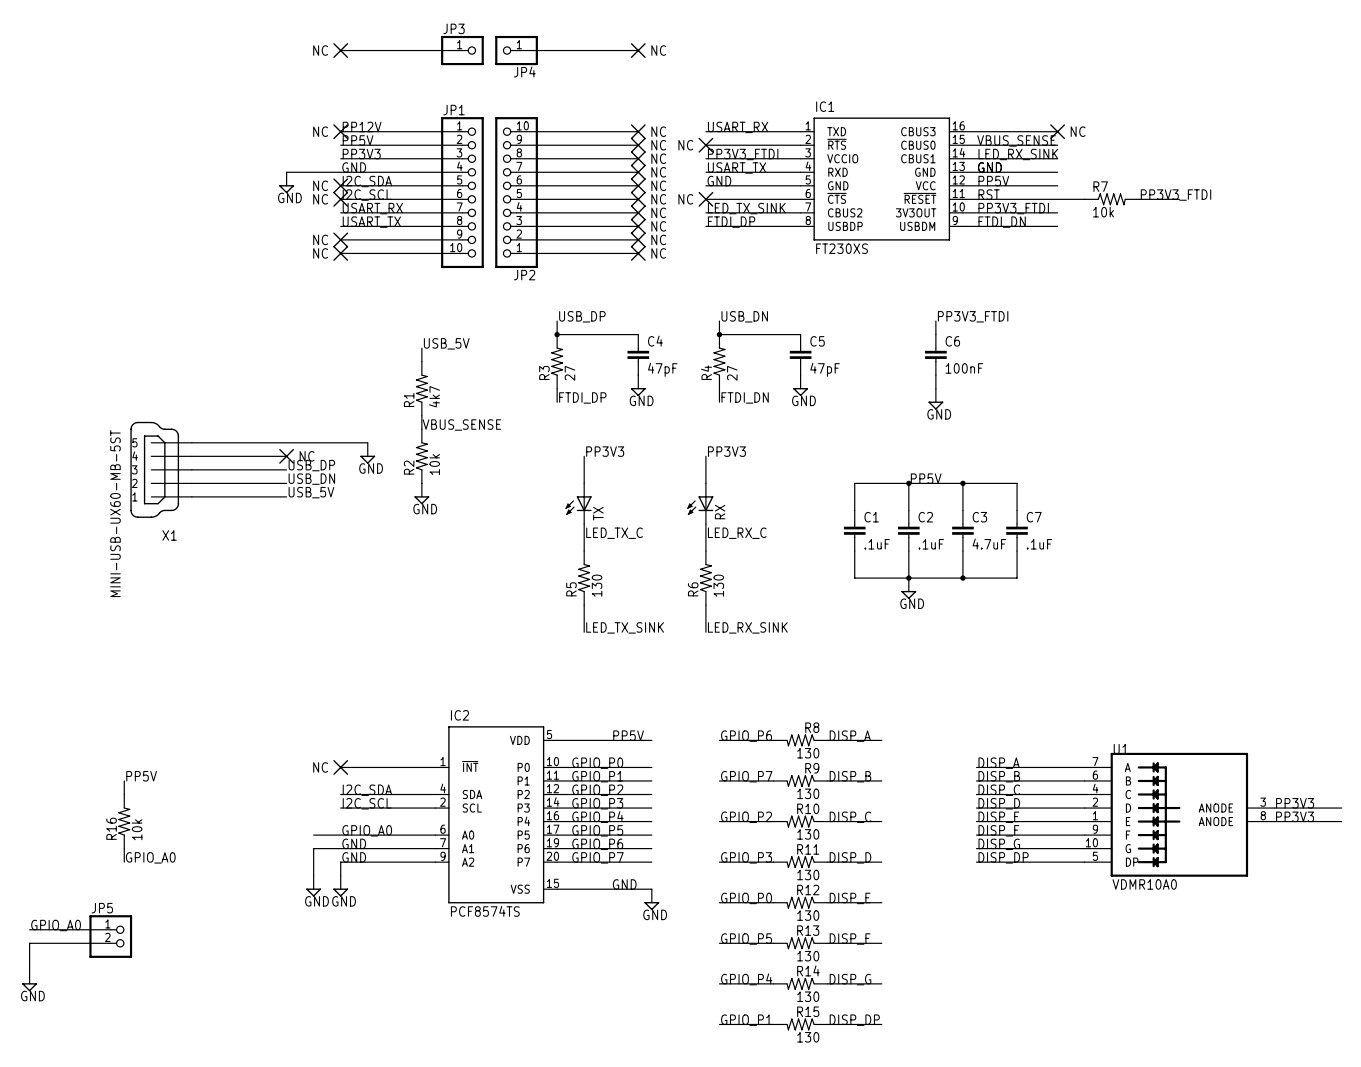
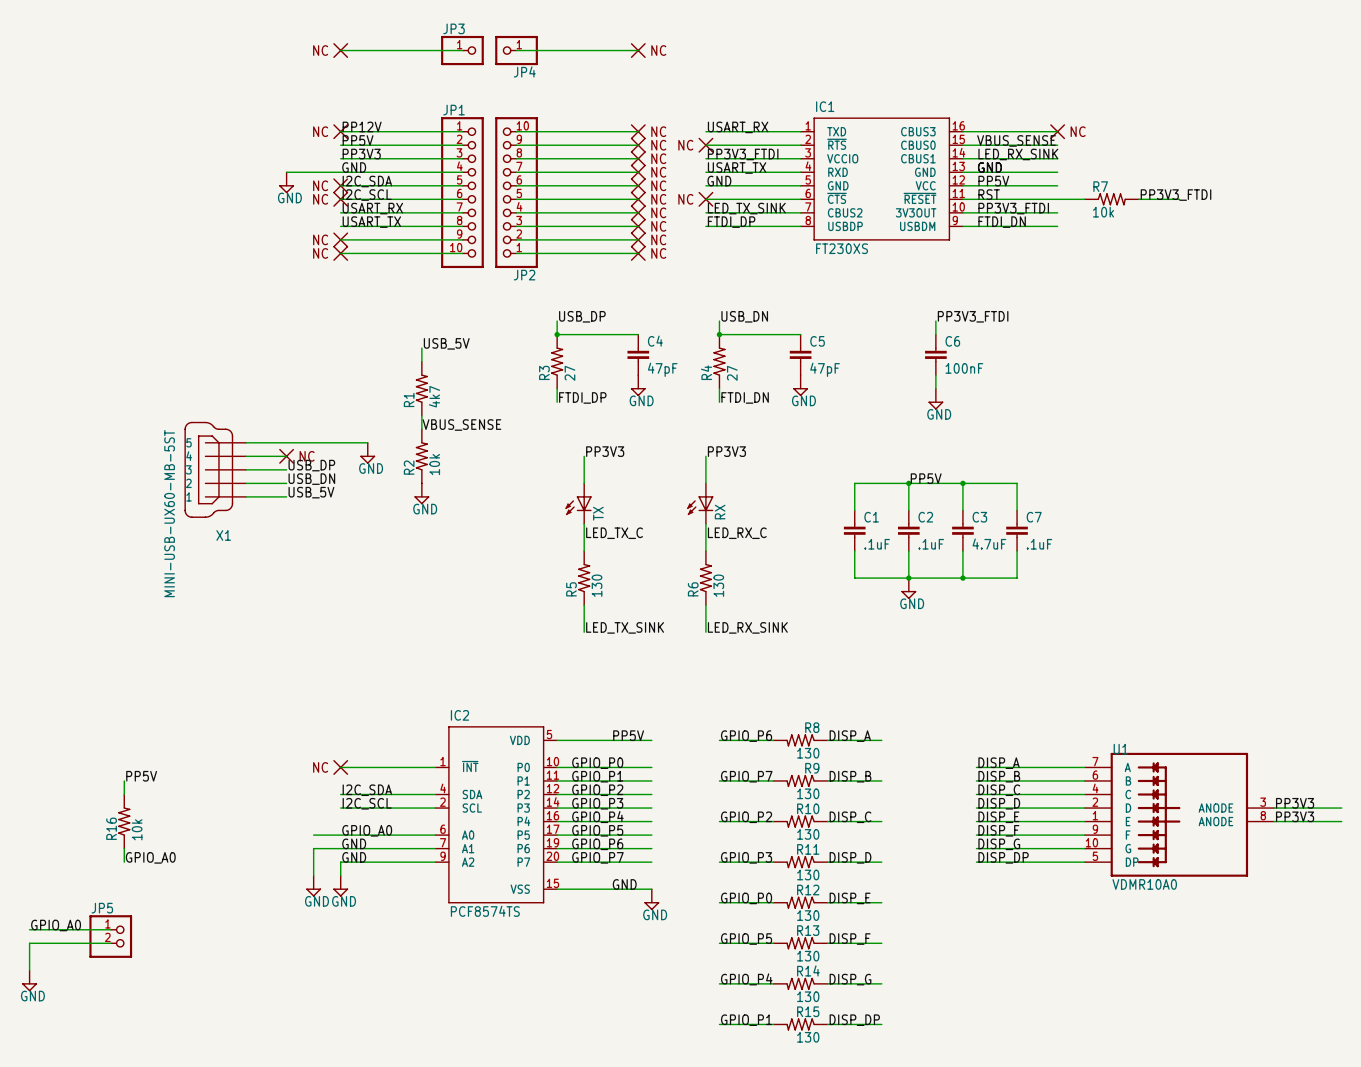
X1 position: (161, 469) -> (215, 469)

